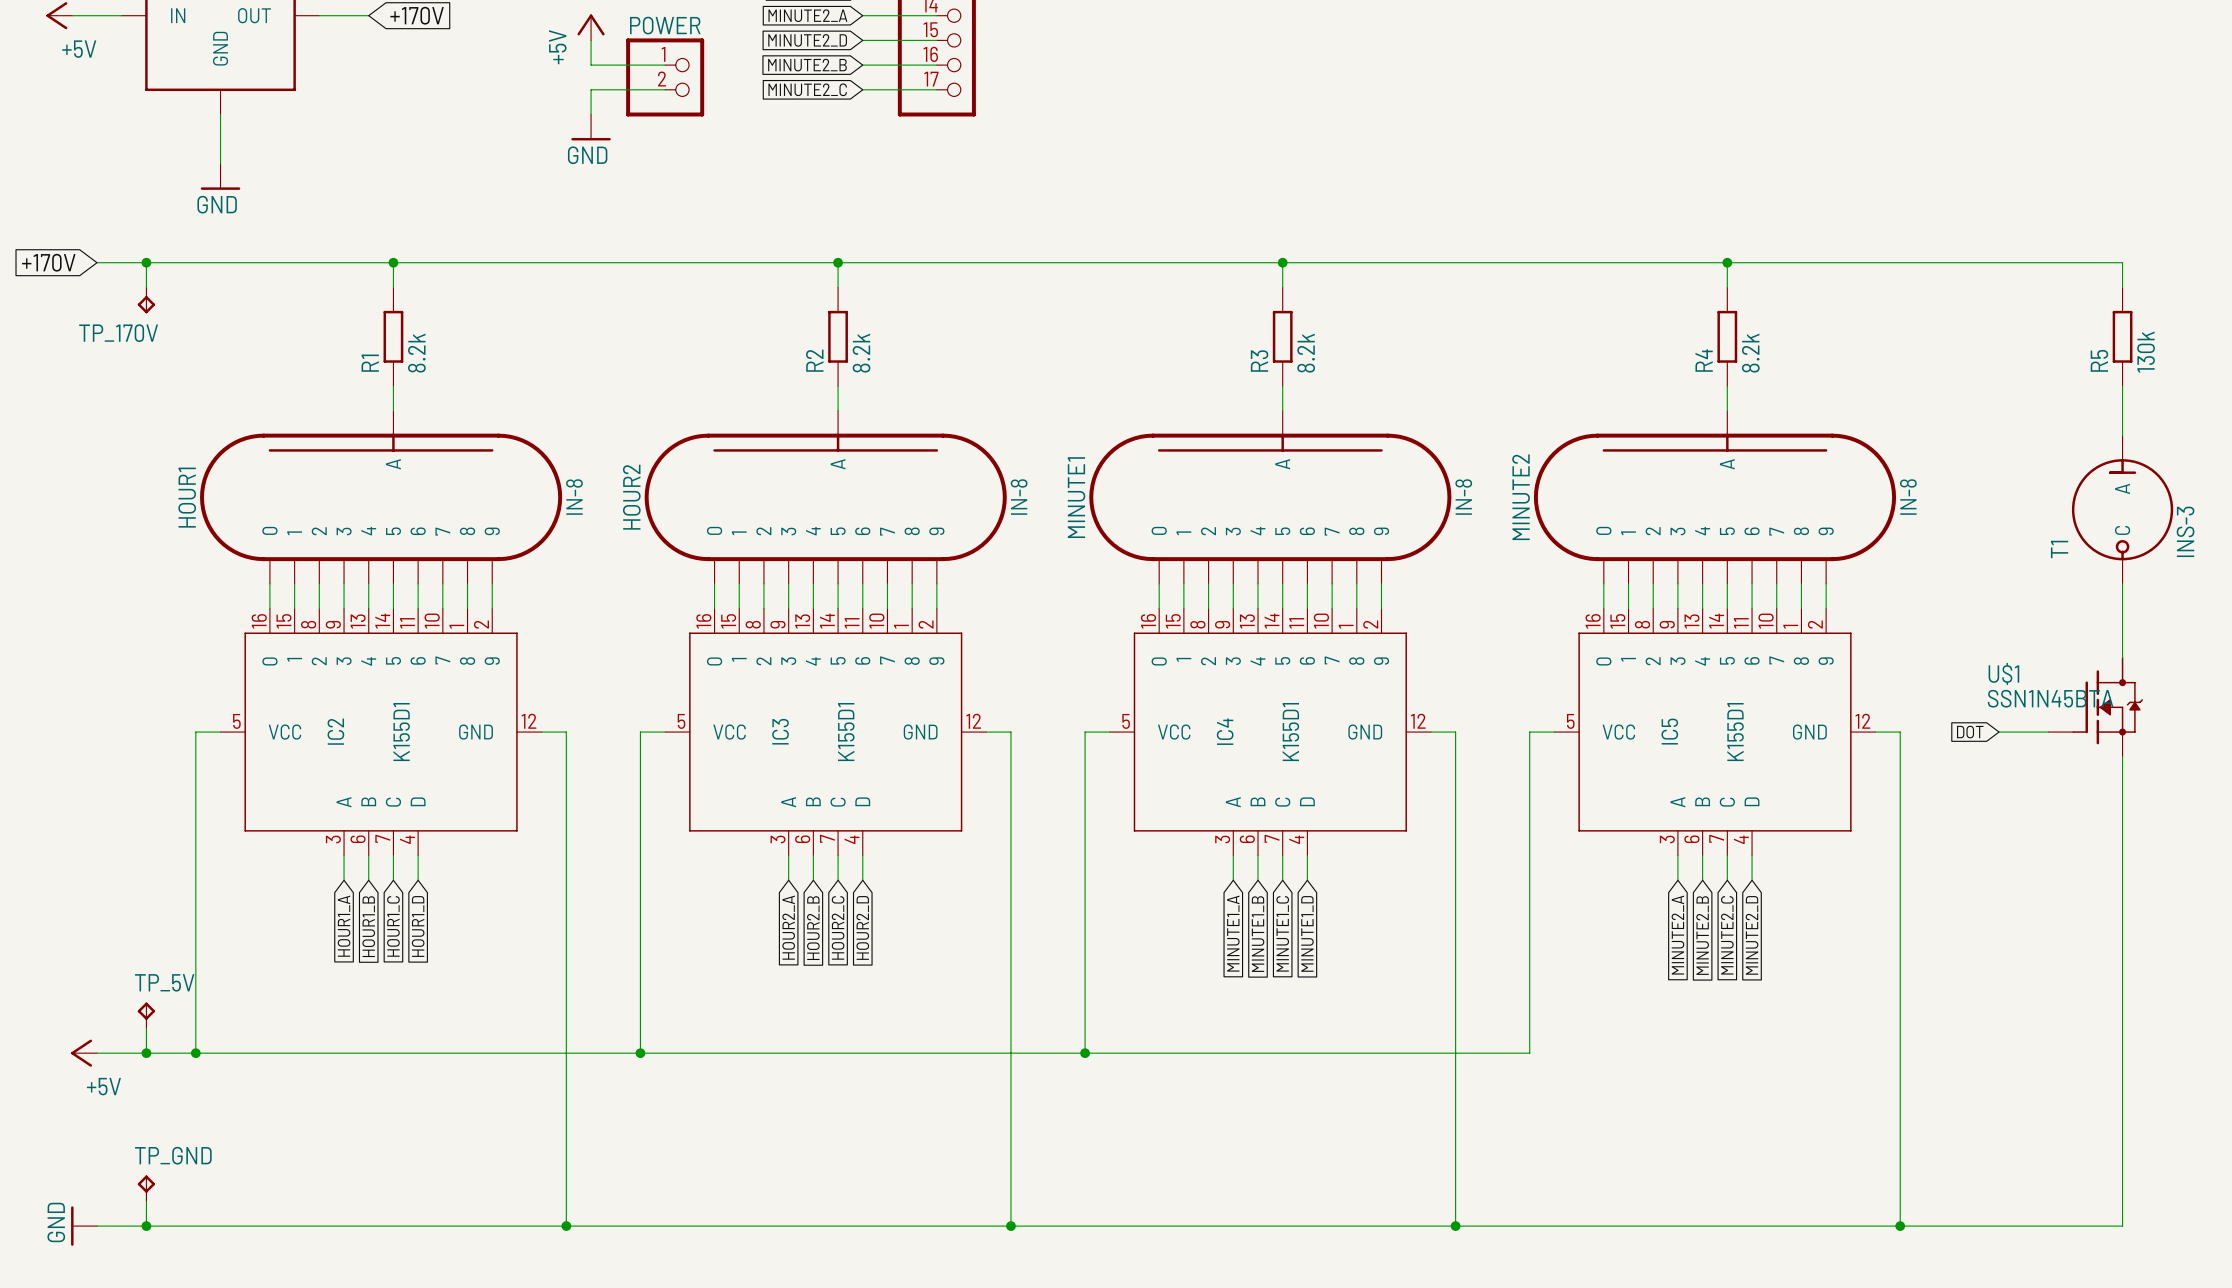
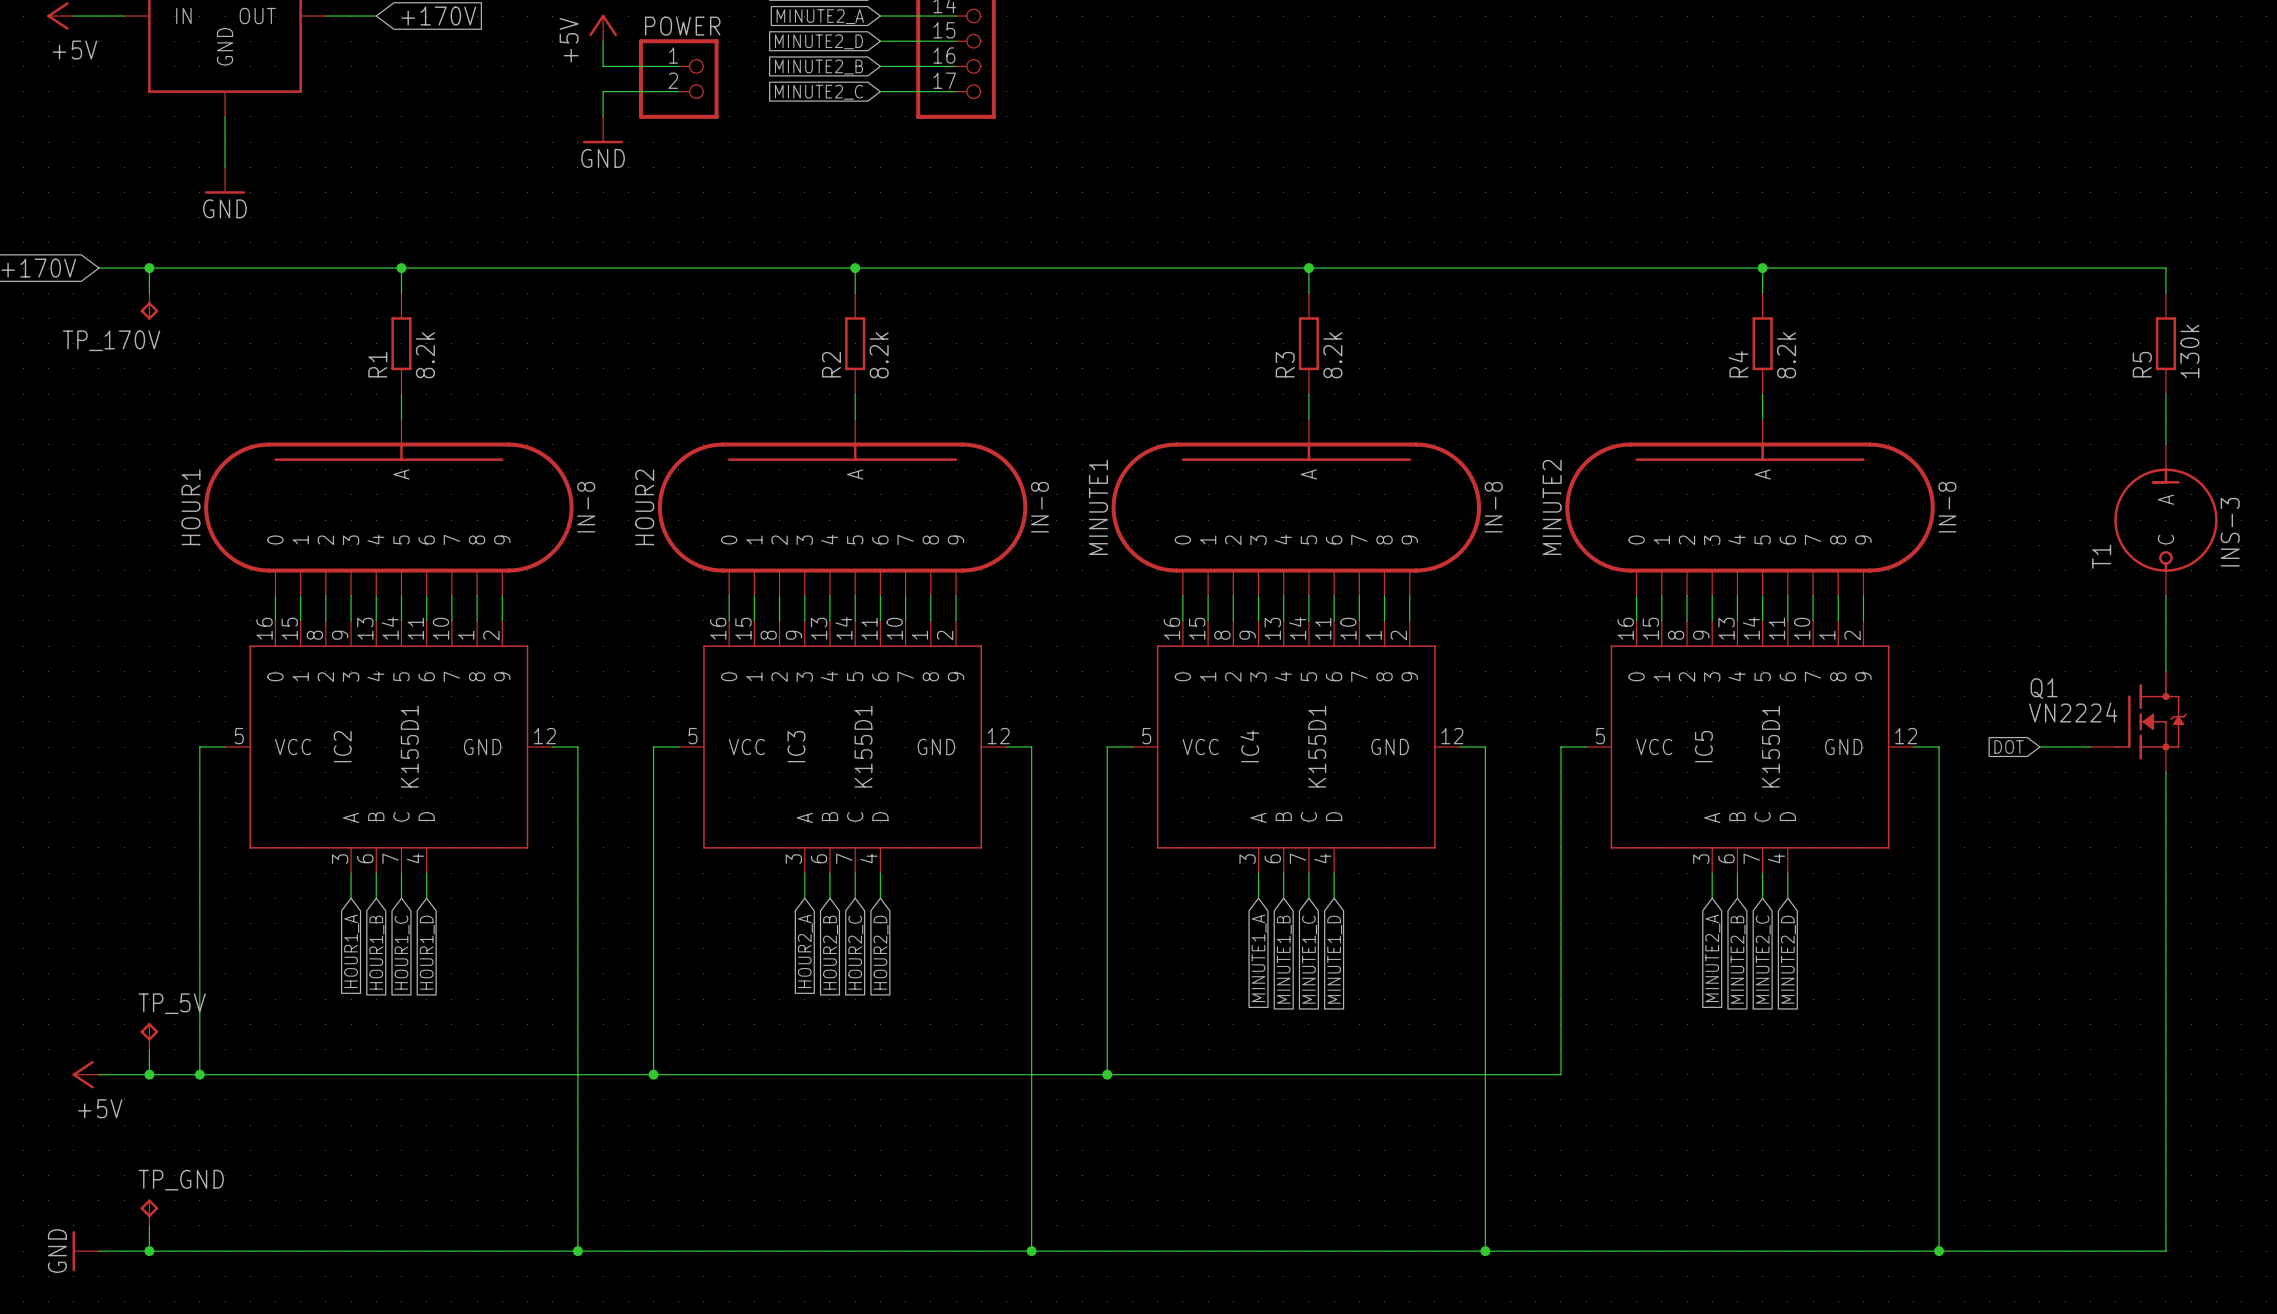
U$1 name: U$1 (2003, 673) -> Q1 (2044, 688)
U$1 value: SSN1N45BTA (2050, 698) -> VN2224 (2073, 712)

